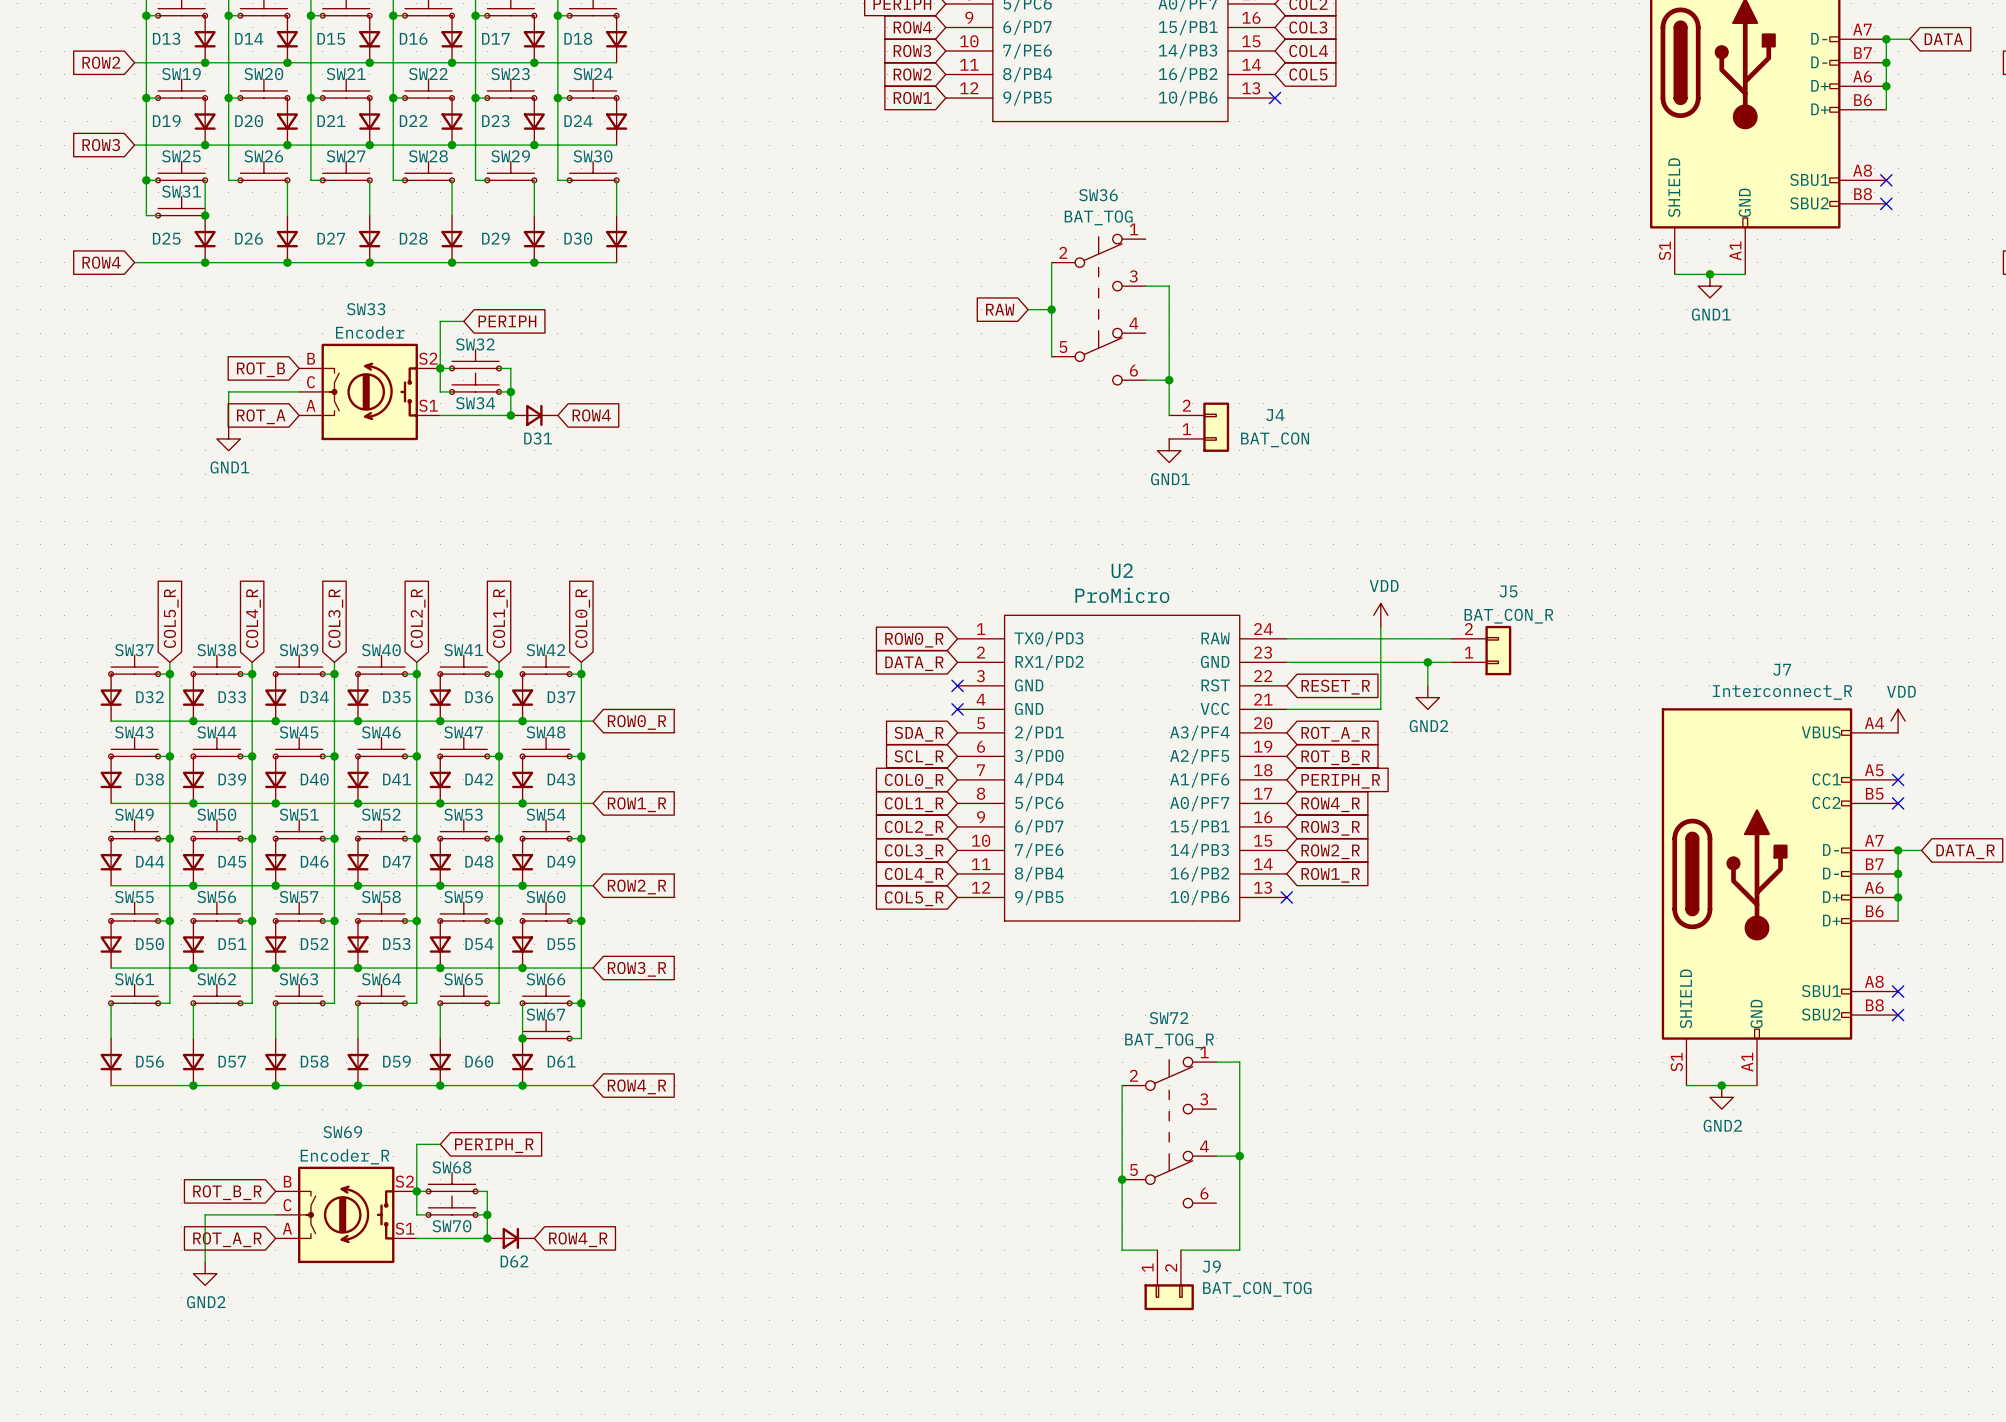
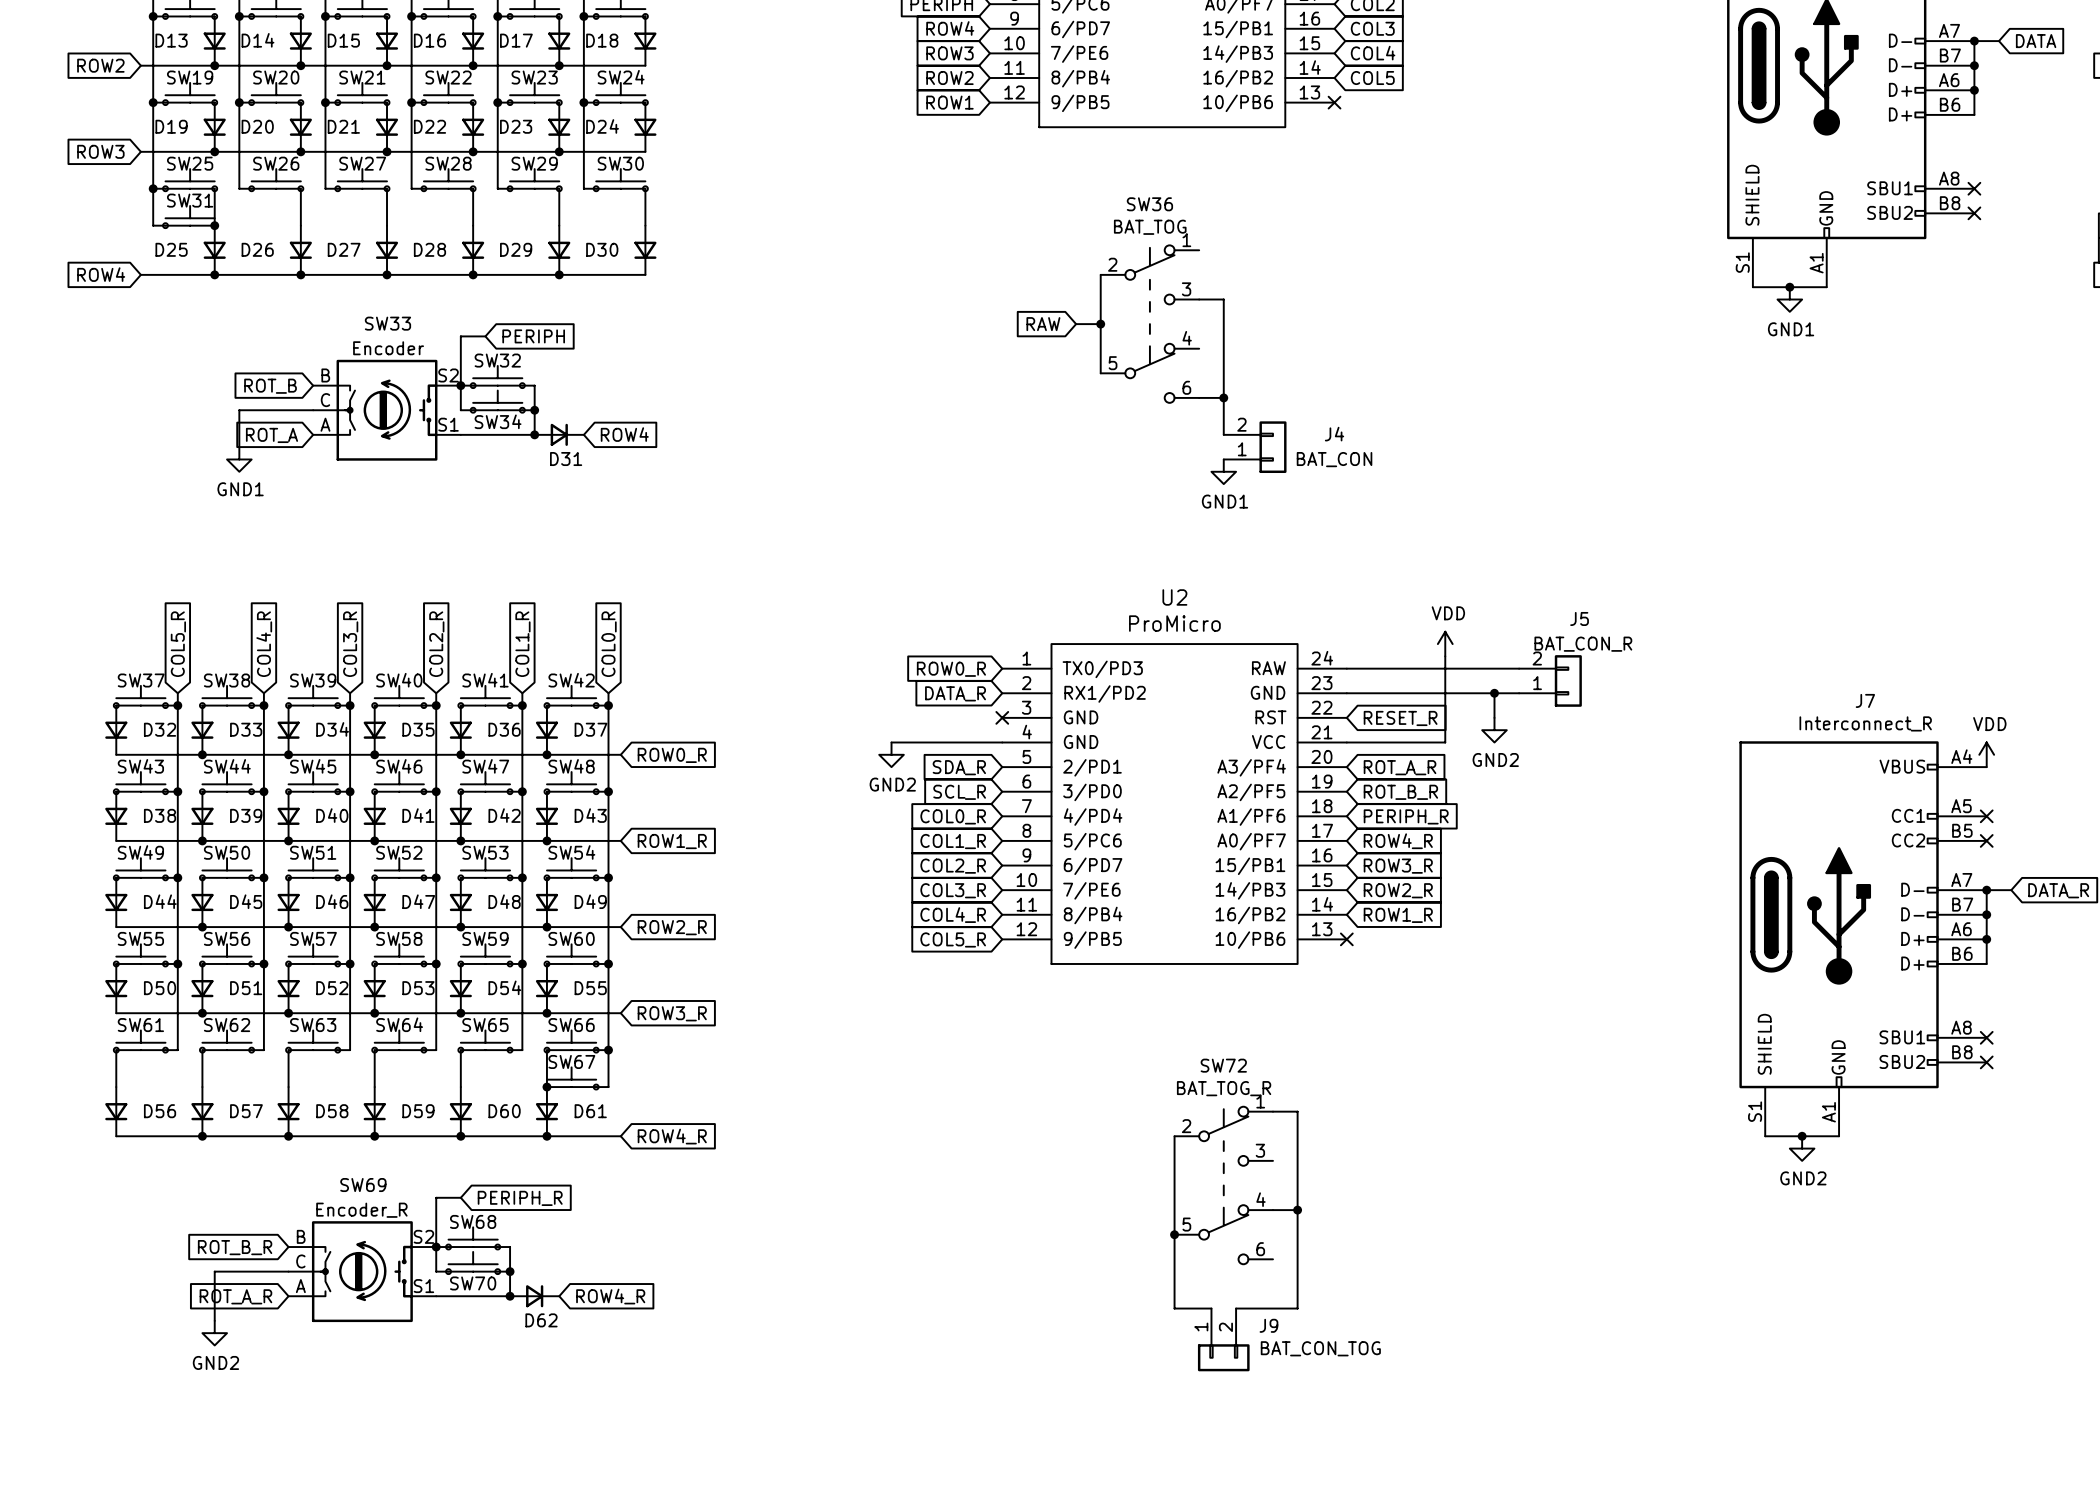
wire: none -> (891, 742) (1002, 742)
no-connect mark: (957, 709) -> none
power symbol: none -> GND2 (891, 754)

